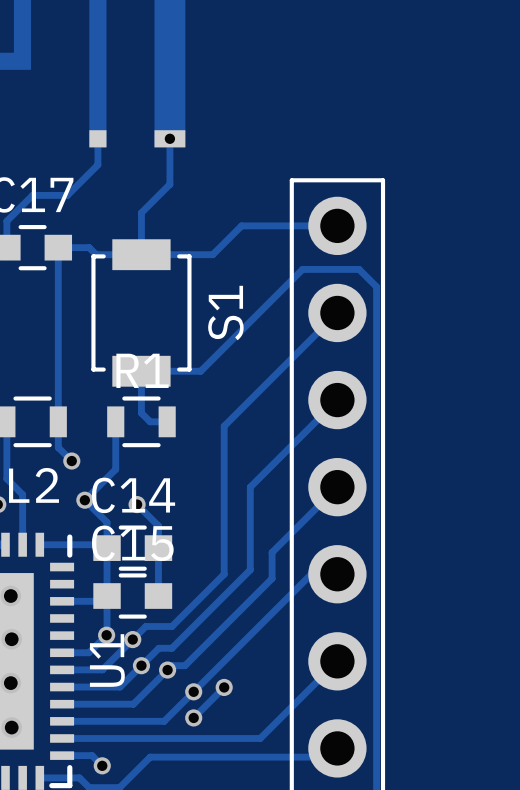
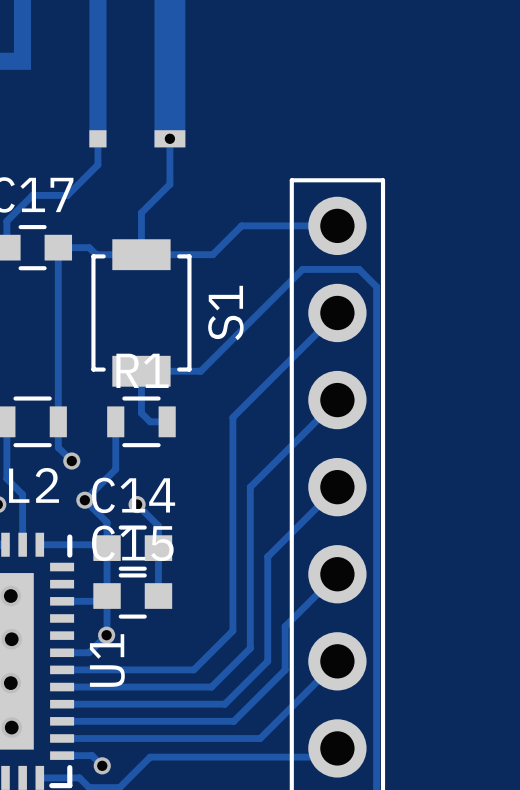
track: (232, 417) (224, 426) (224, 574) (171, 626) (145, 626) (102, 669) -> (232, 417) (232, 630) (193, 669) (102, 669)
track: (272, 552) (272, 578) (185, 665) (171, 665) (133, 704) -> (272, 552) (267, 556) (267, 661) (224, 704) (133, 704)
track: (250, 569) (171, 648) (158, 648) (120, 687) -> (250, 569) (250, 648) (211, 687) (120, 687)
track: (337, 574) (311, 574) (164, 721) -> (337, 574) (285, 626) (285, 670) (233, 721) (164, 721)
via: (132, 639) -> none
via: (141, 665) -> none
via: (167, 670) -> none
track: (224, 687) (193, 717) -> none
via: (224, 687) -> none
via: (193, 691) -> none
via: (193, 717) -> none

